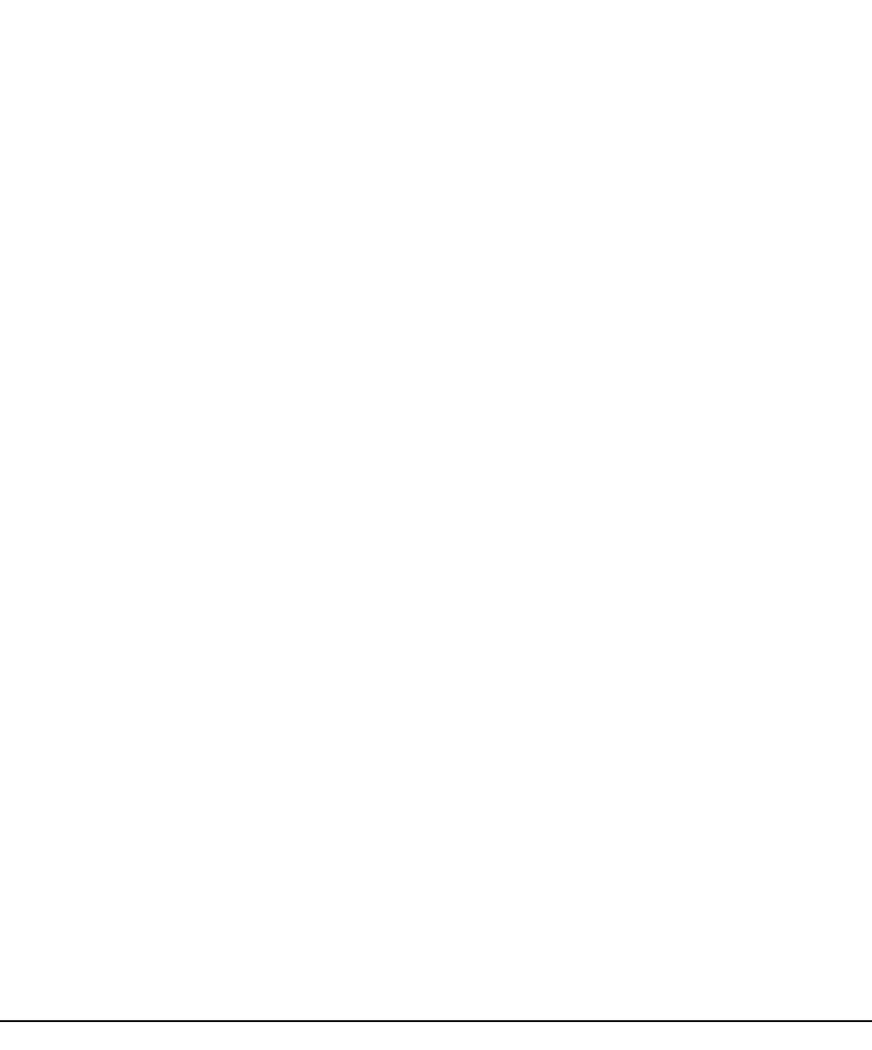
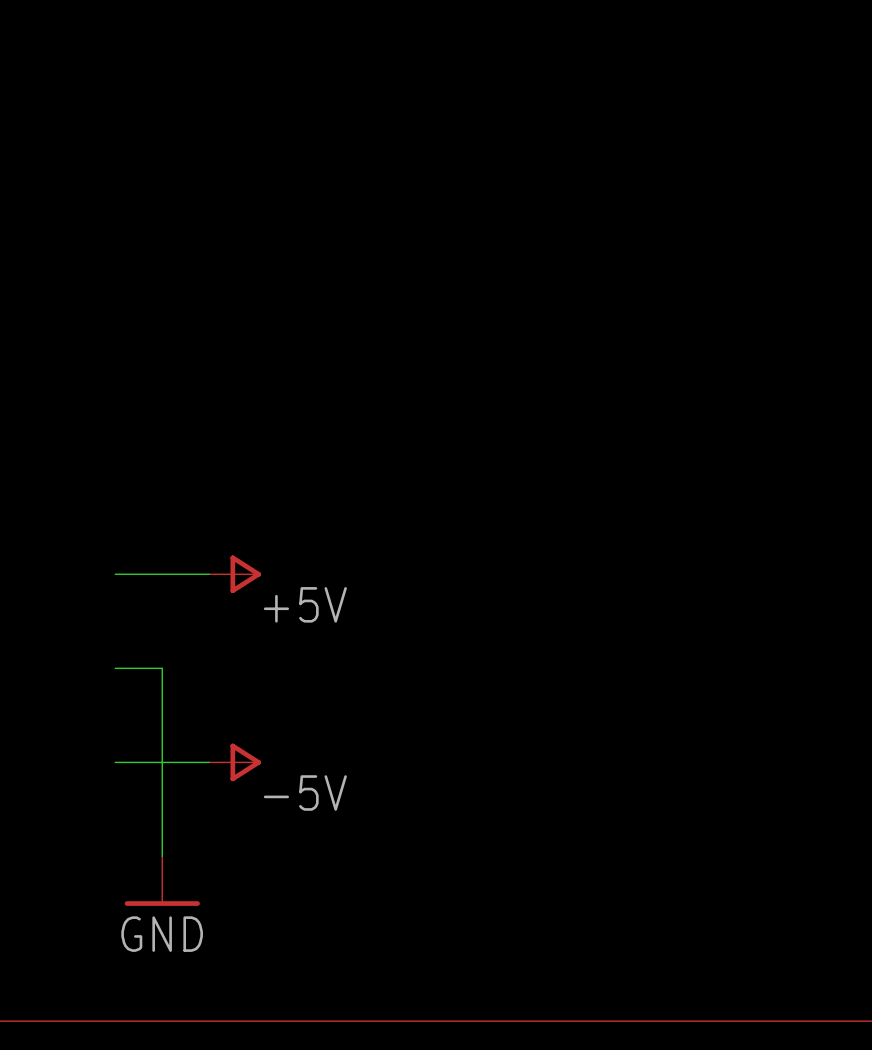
wire: none -> (115, 574) (209, 574)
power symbol: none -> +5V (235, 574)
wire: none -> (115, 668) (162, 668) (162, 856)
wire: none -> (115, 762) (209, 762)
power symbol: none -> -5V (235, 762)
power symbol: none -> GND (162, 881)

